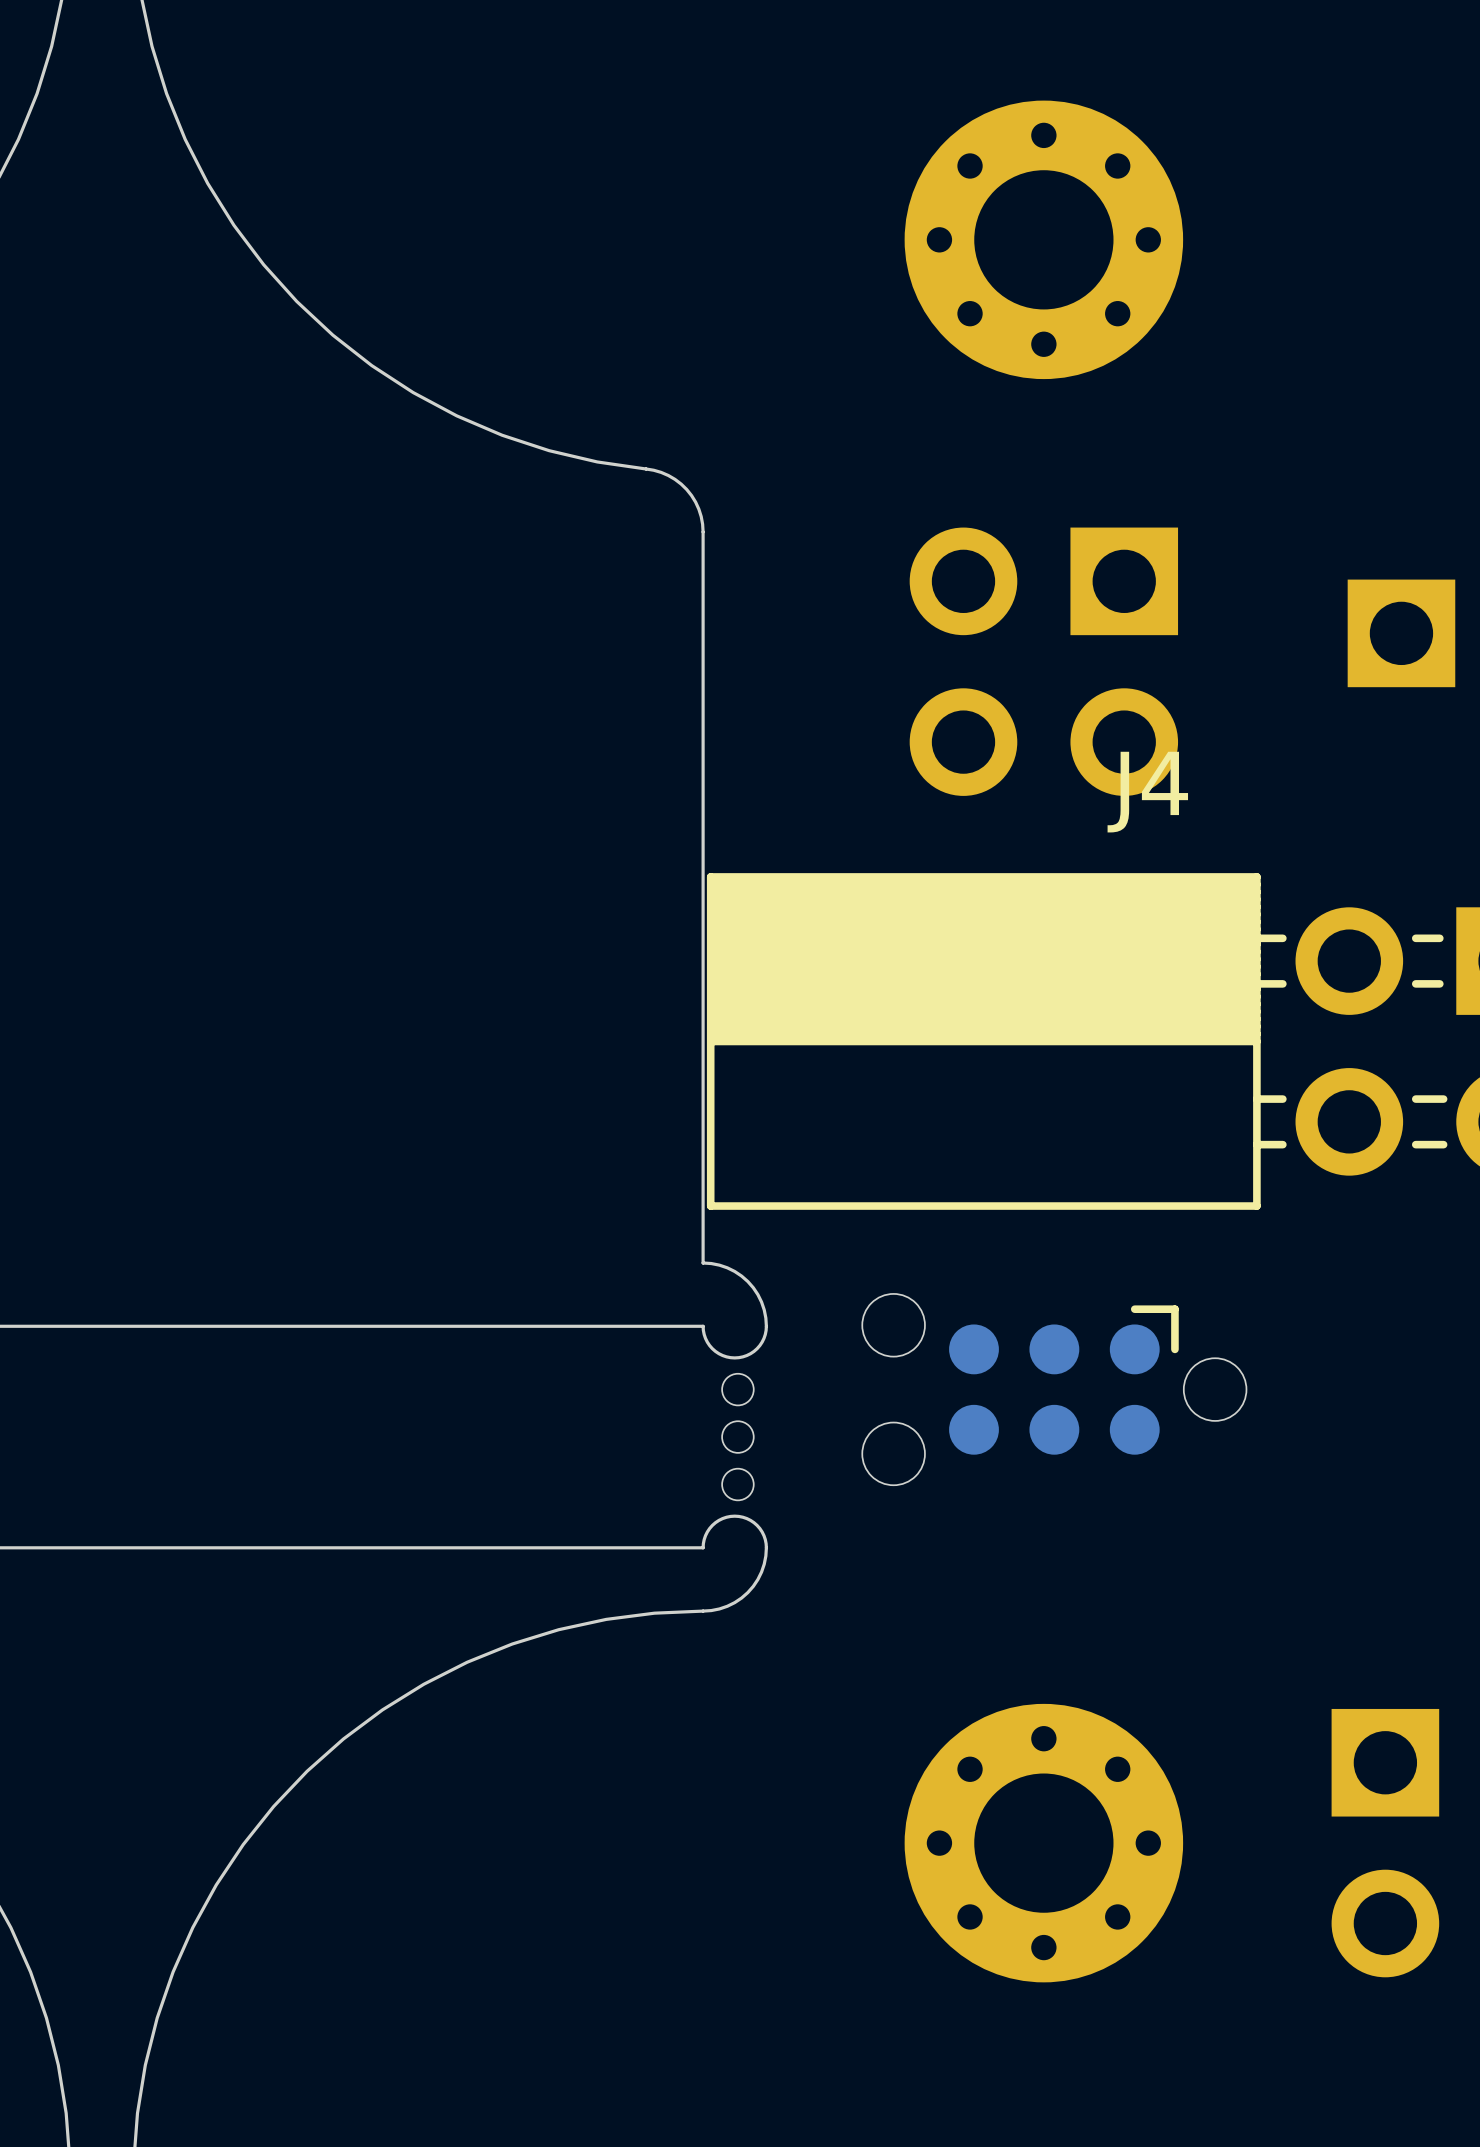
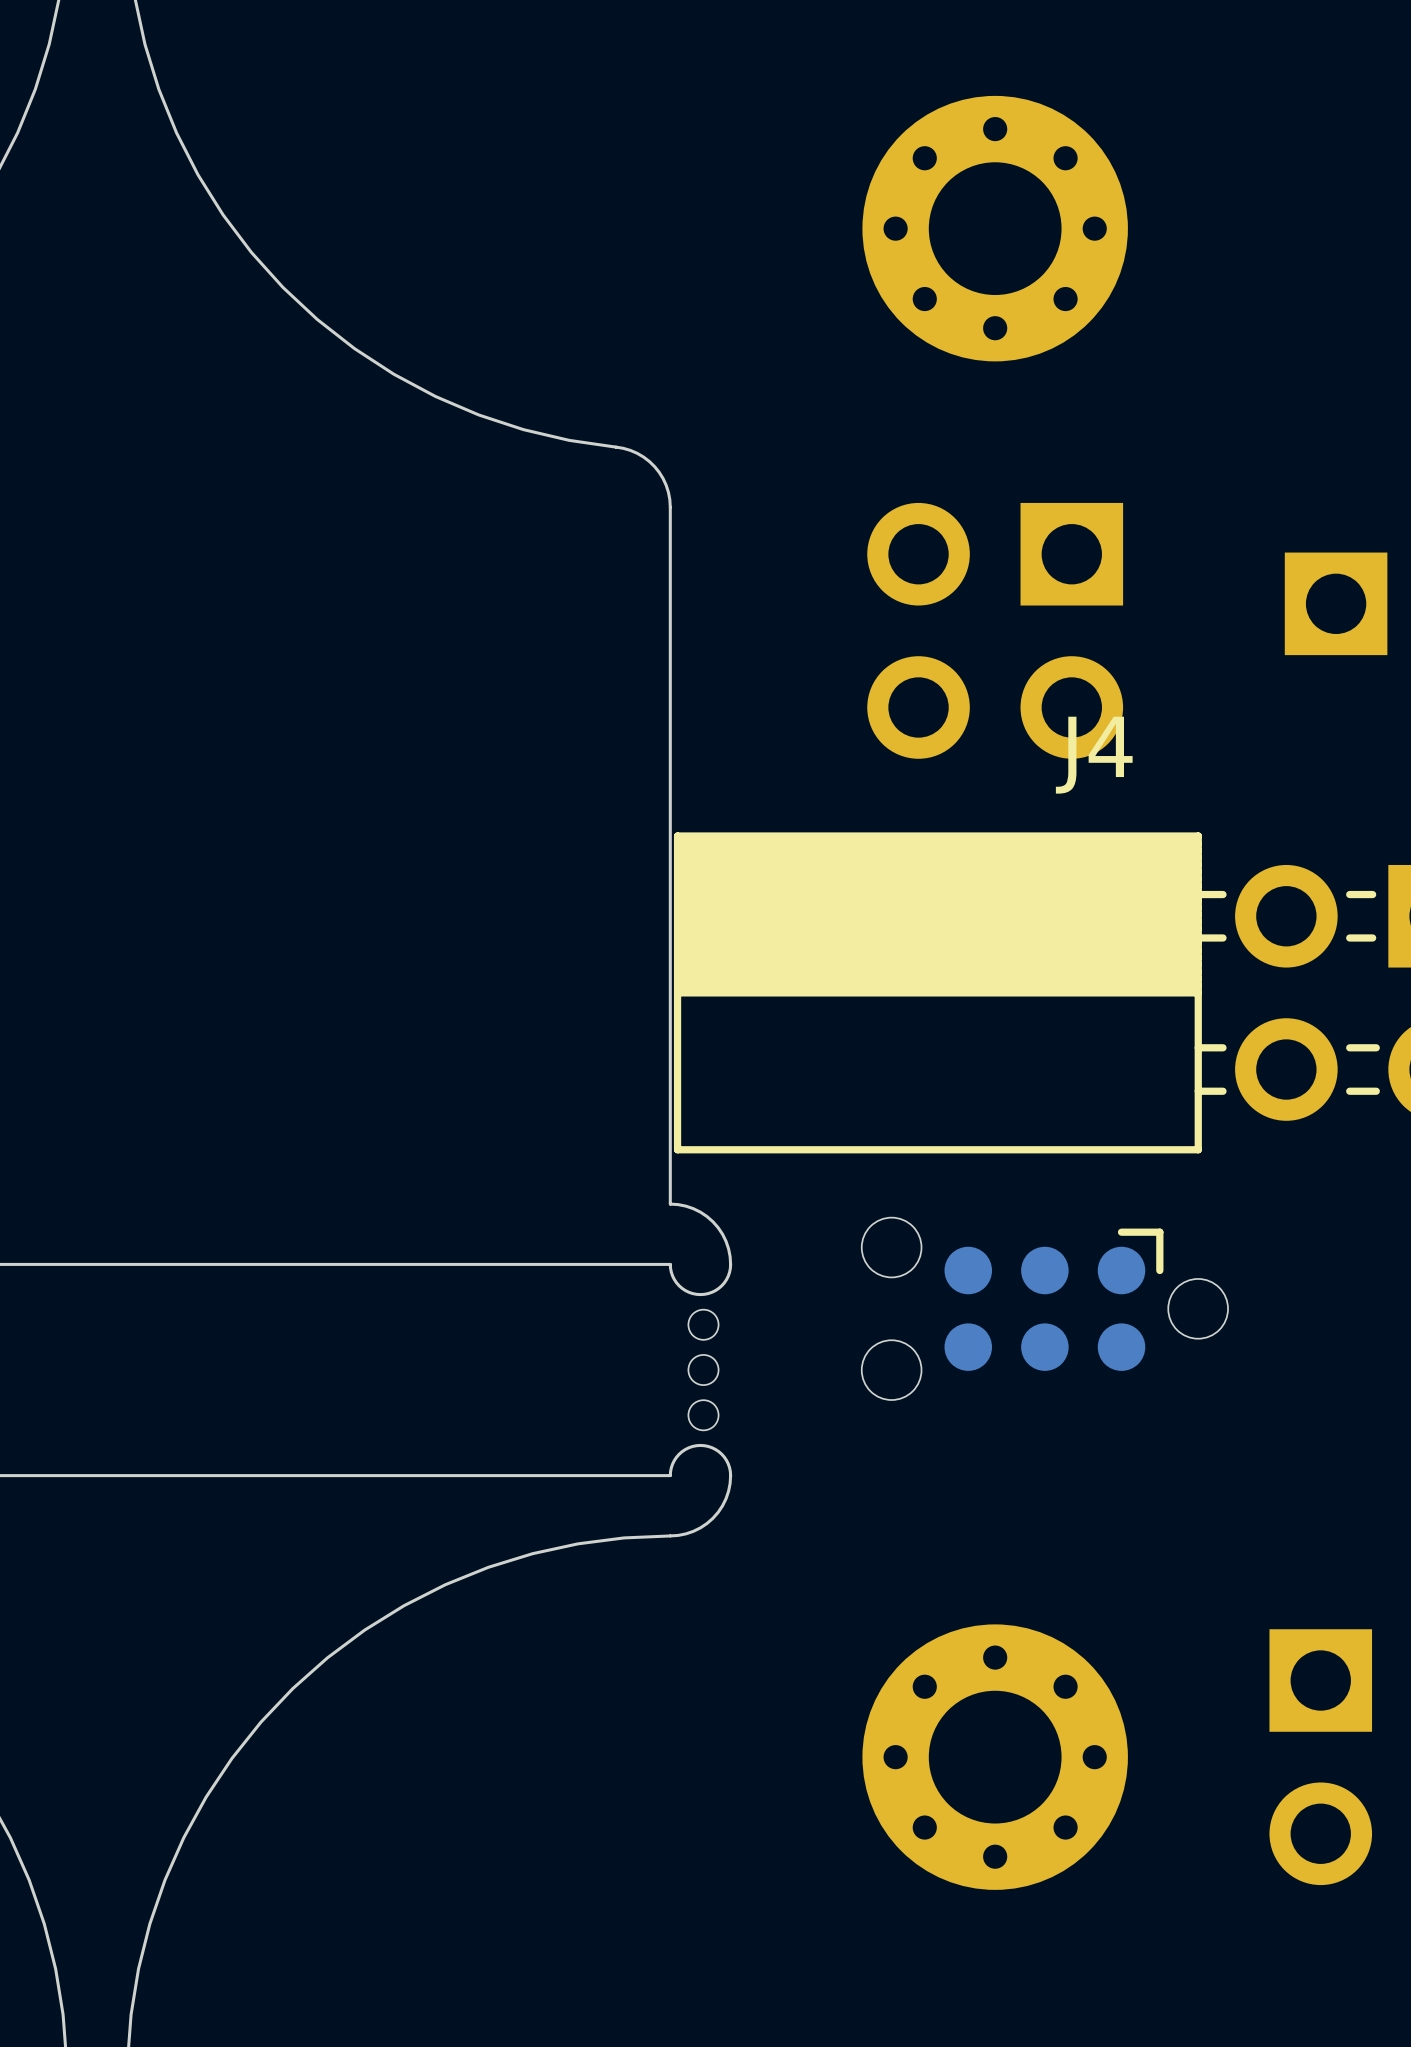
part position: (1054, 1389) -> (1044, 1308)

